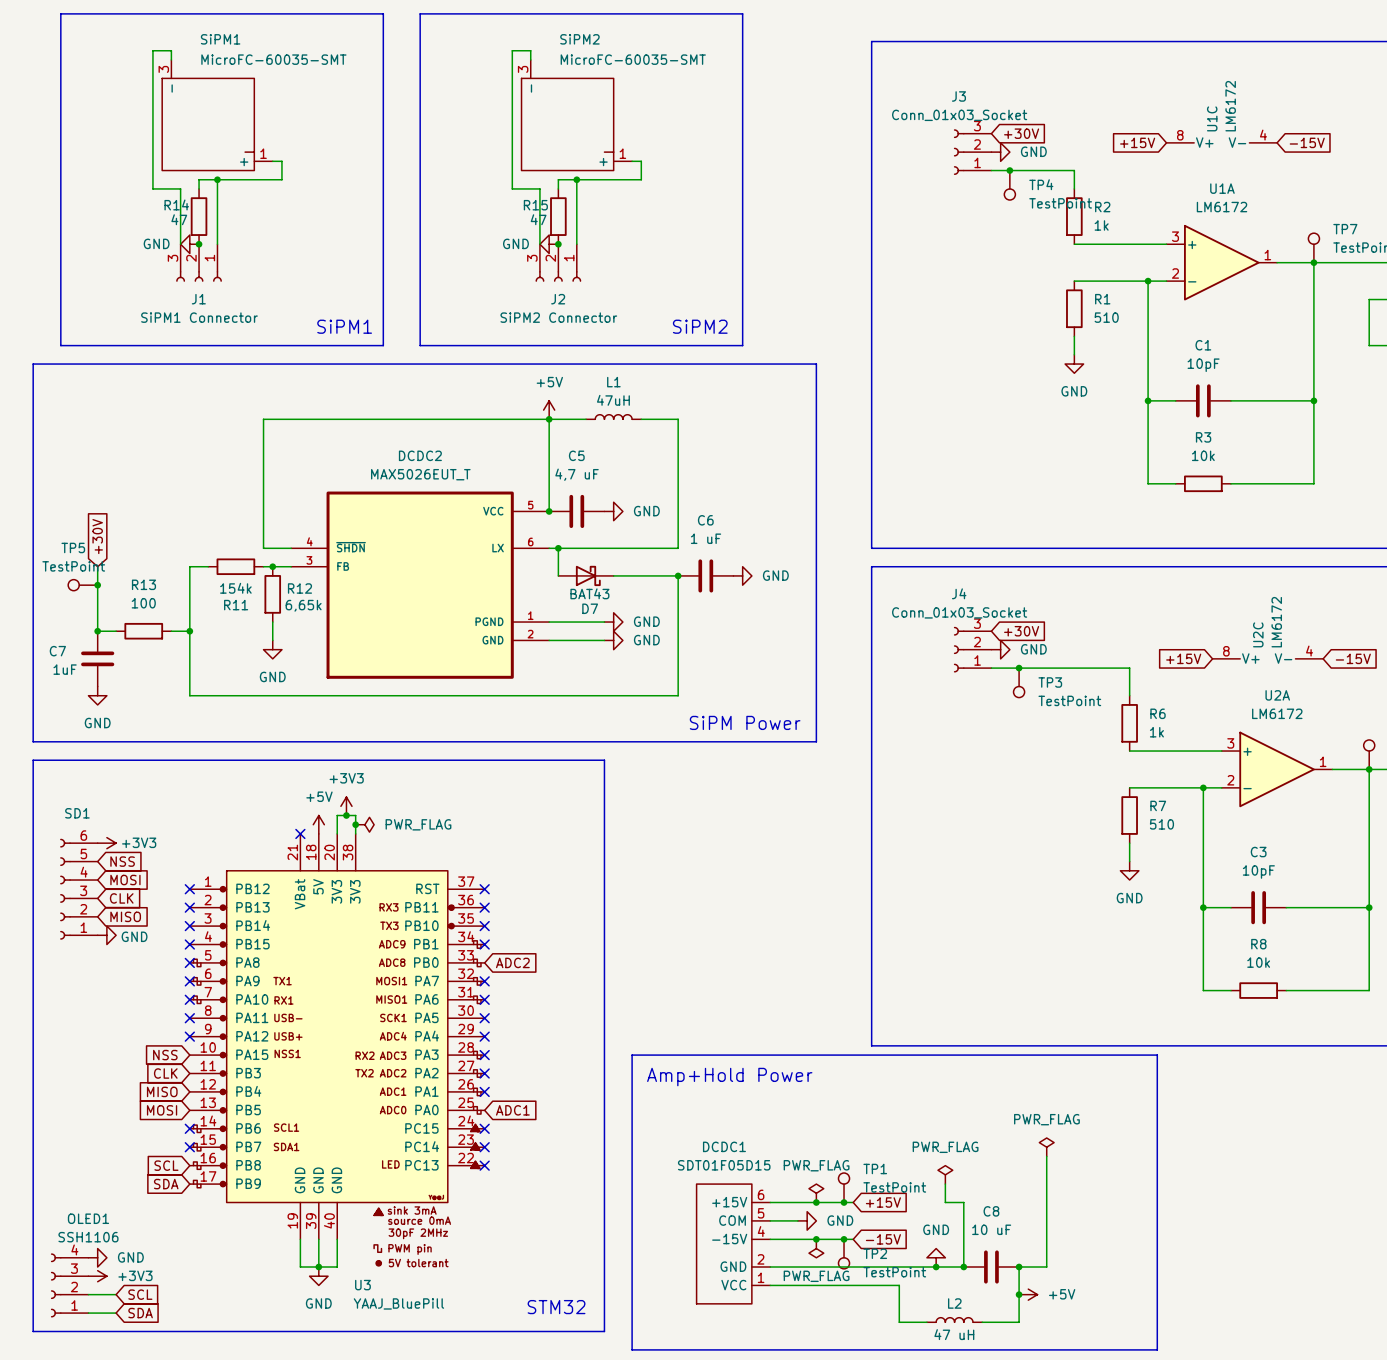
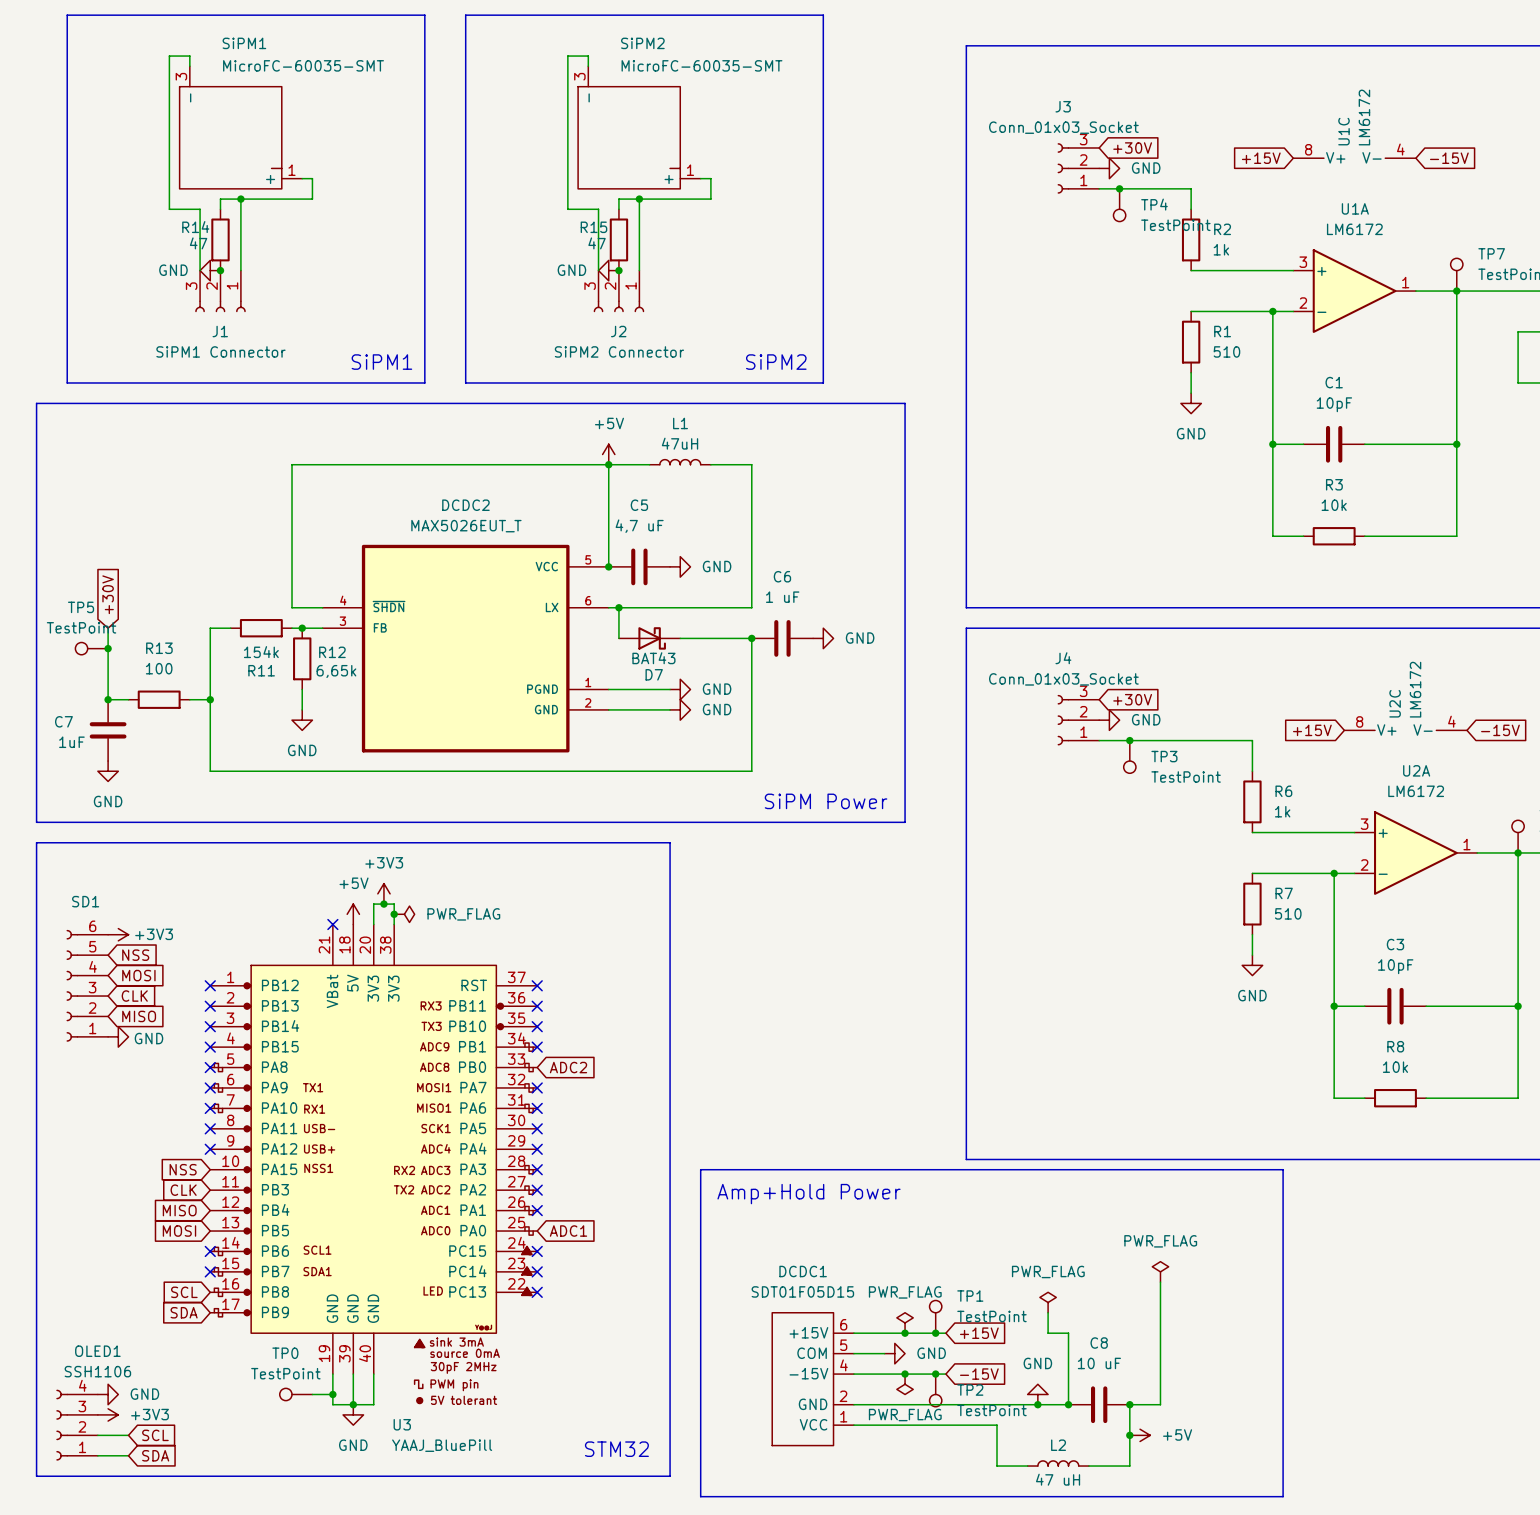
TP0: none -> TestPoint (296, 1394)
wire: none -> (312, 1394) (332, 1394)
junction: none -> (332, 1394)

